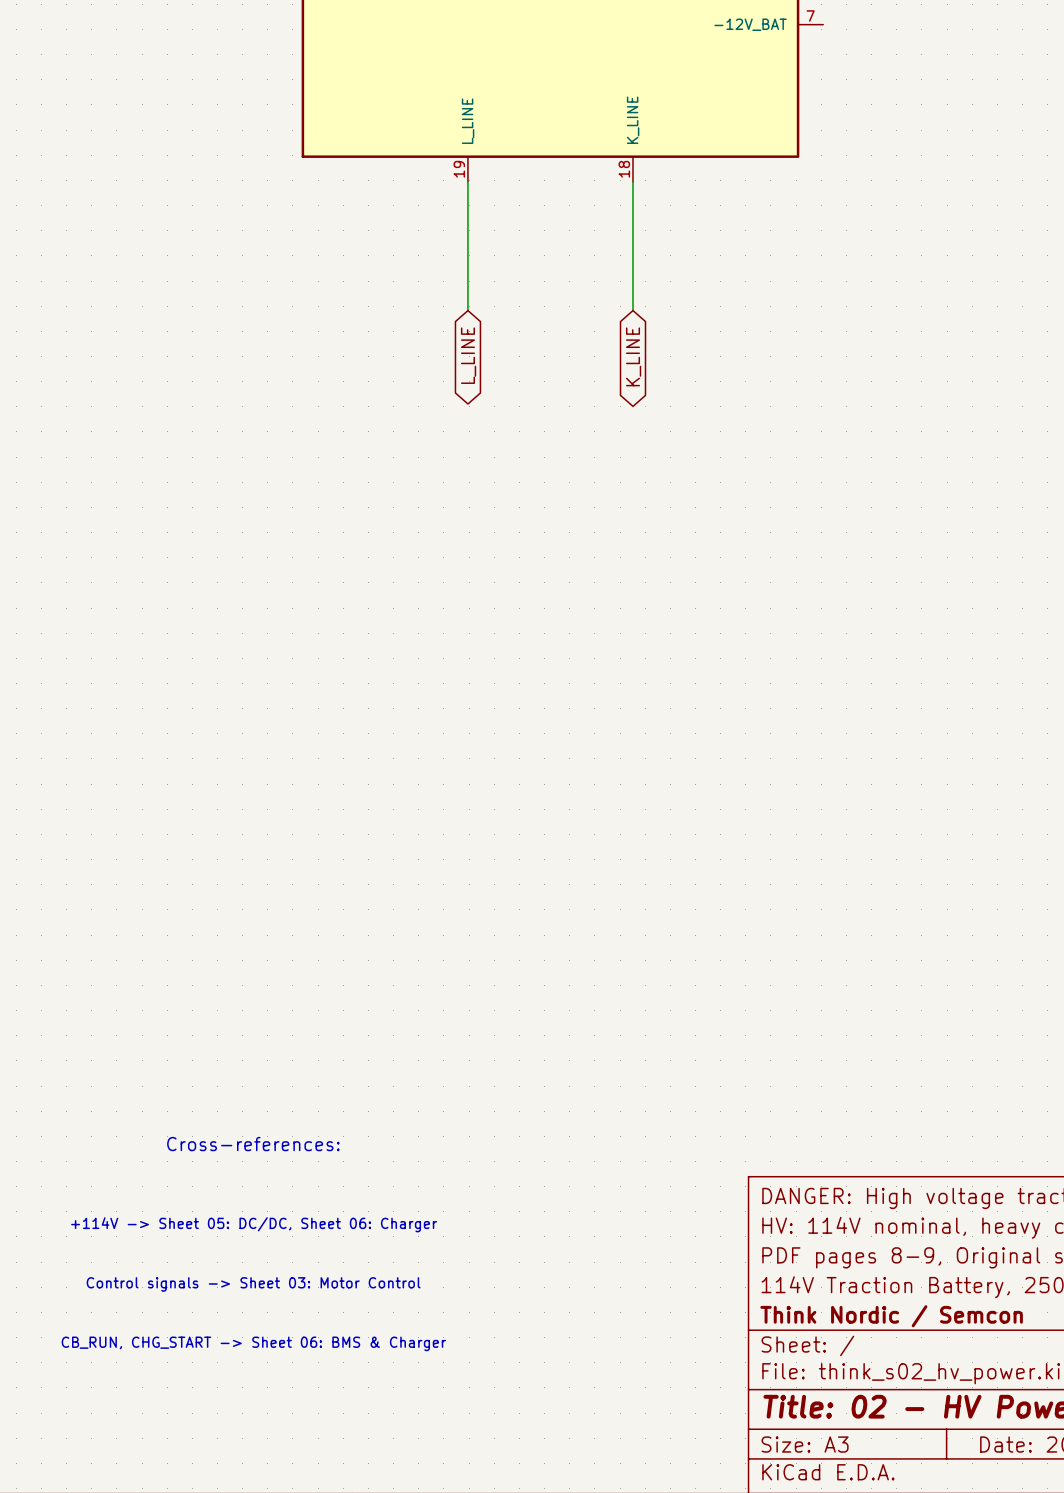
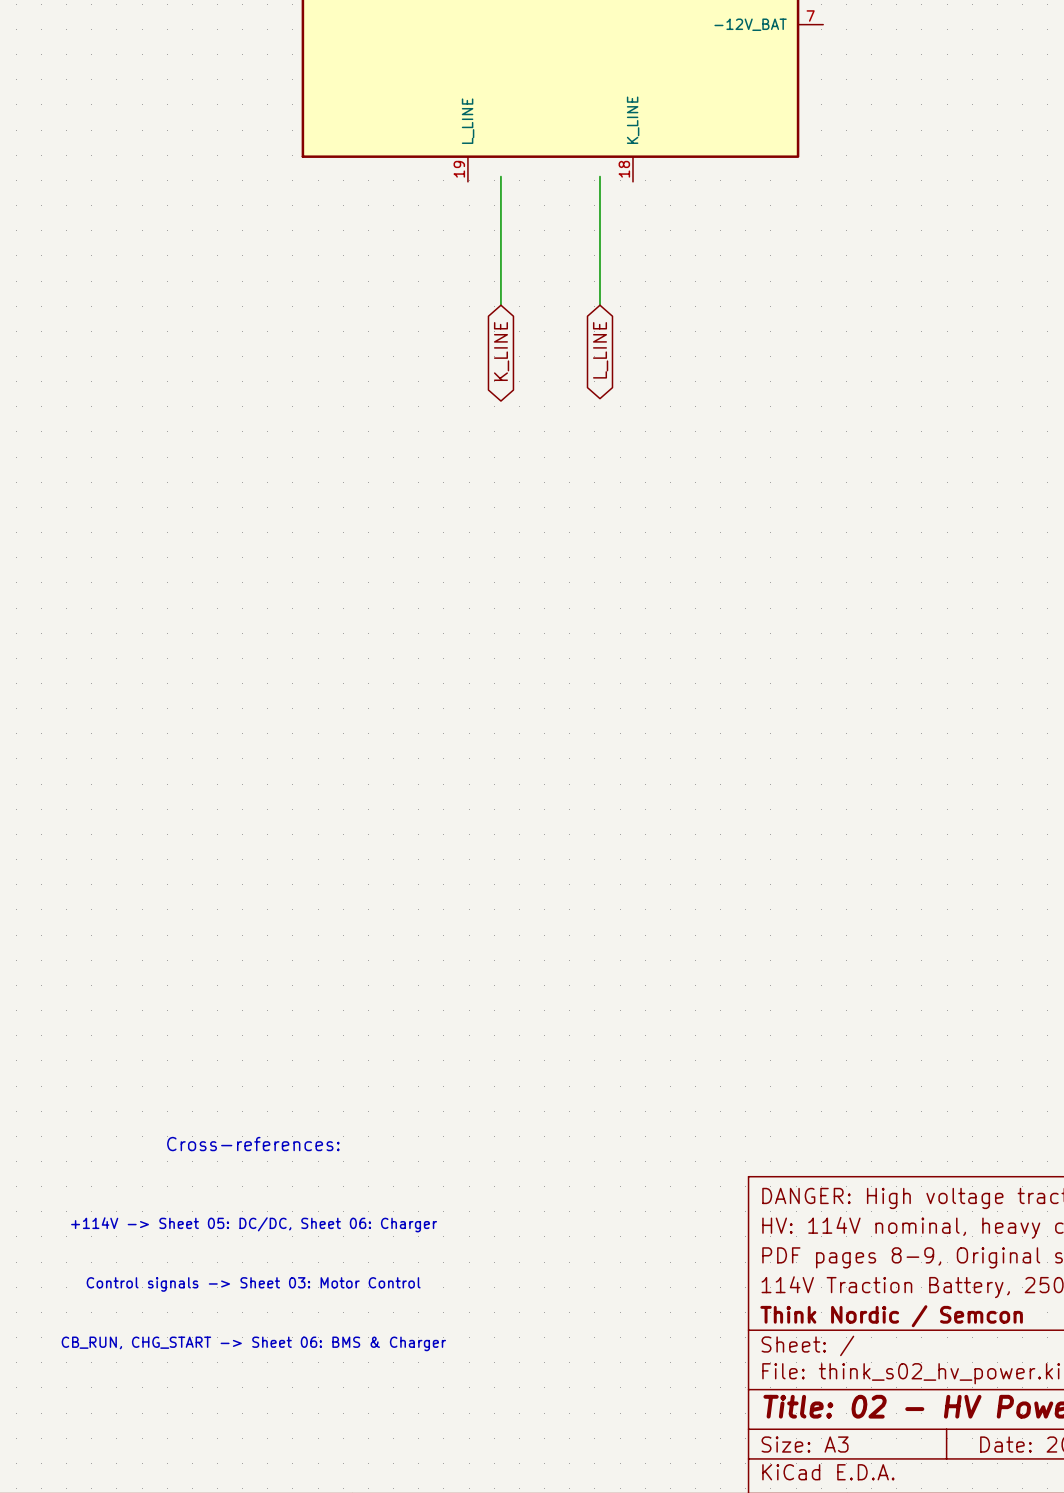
wire: (467, 181) (467, 310) -> (500, 176) (500, 305)
wire: (633, 181) (633, 310) -> (599, 176) (599, 305)
global label position: L_LINE (468, 355) -> L_LINE (600, 350)
global label position: K_LINE (633, 356) -> K_LINE (501, 351)

